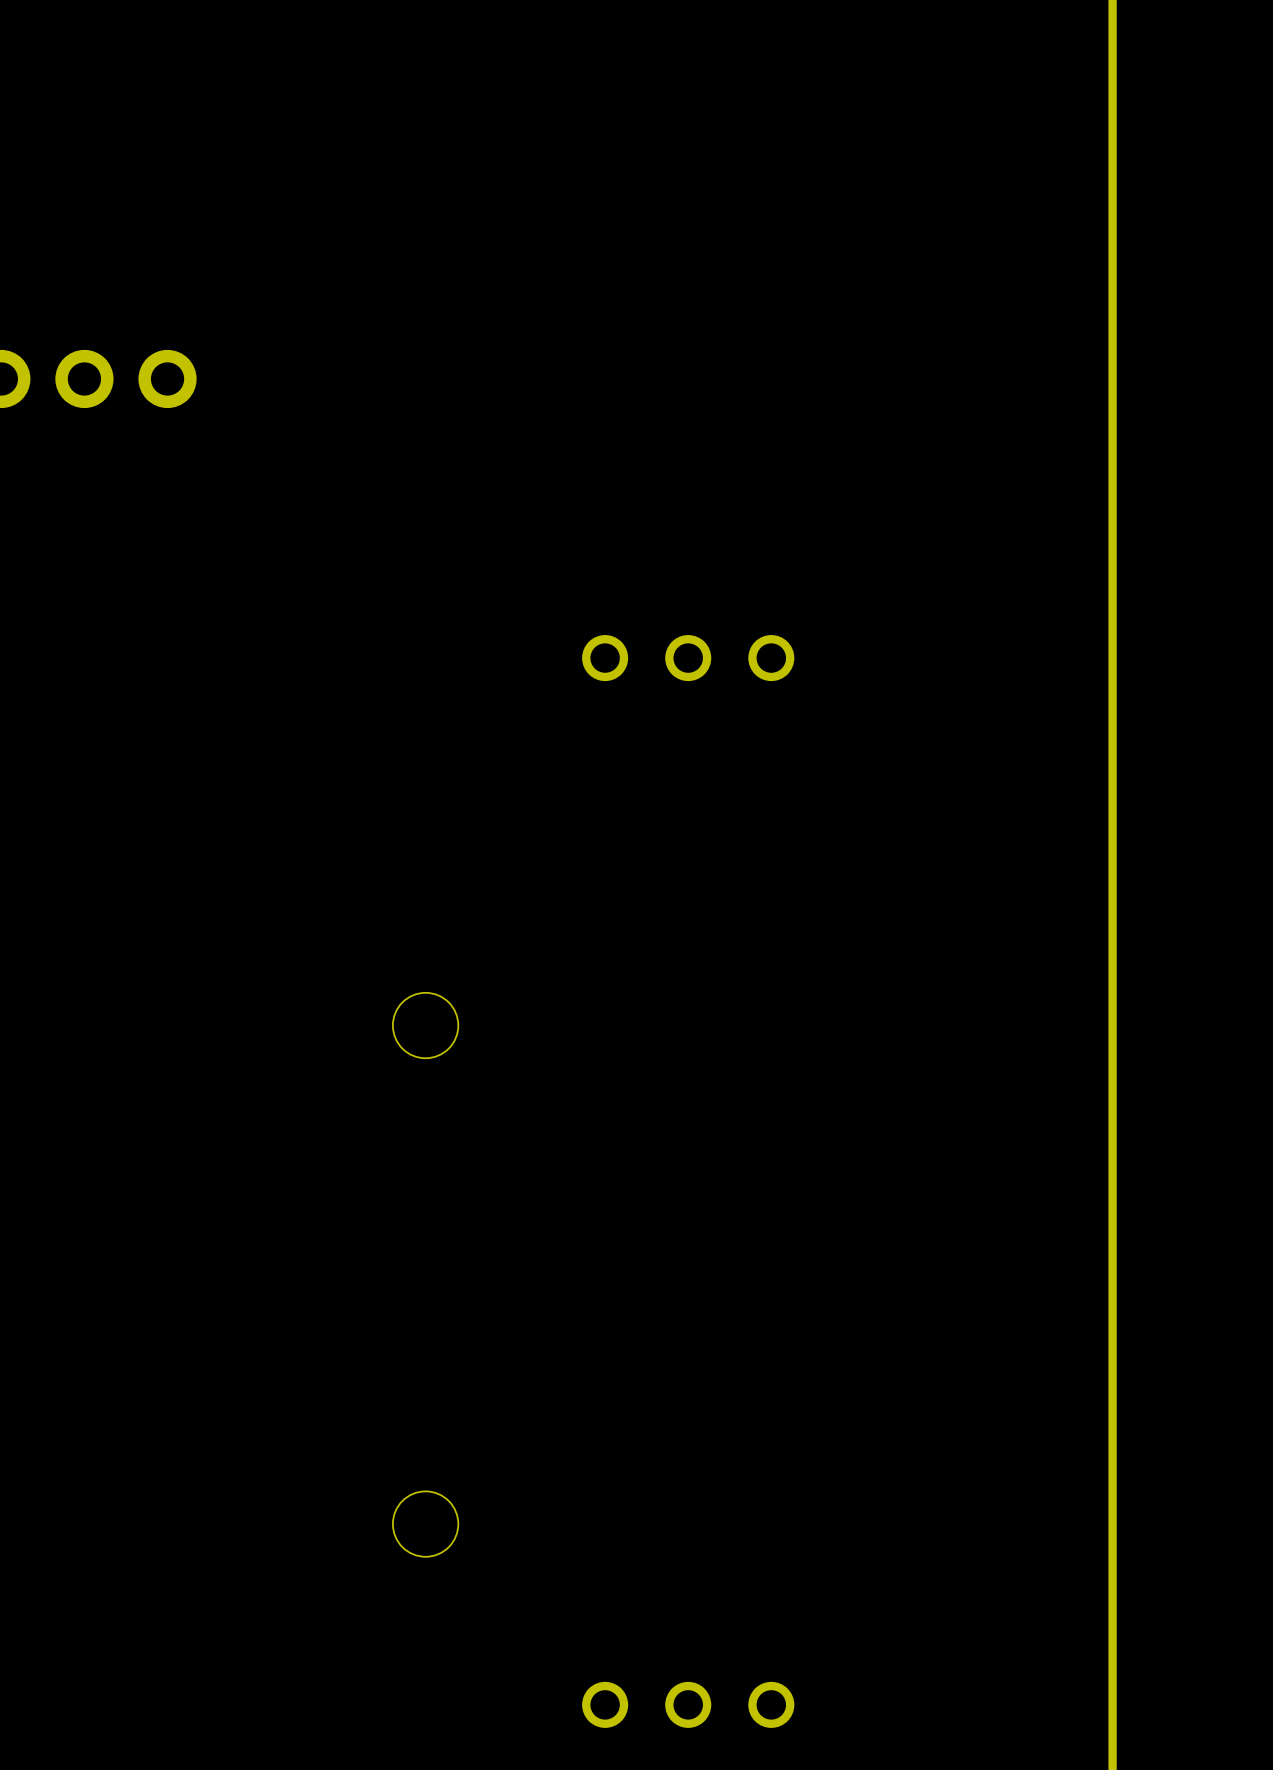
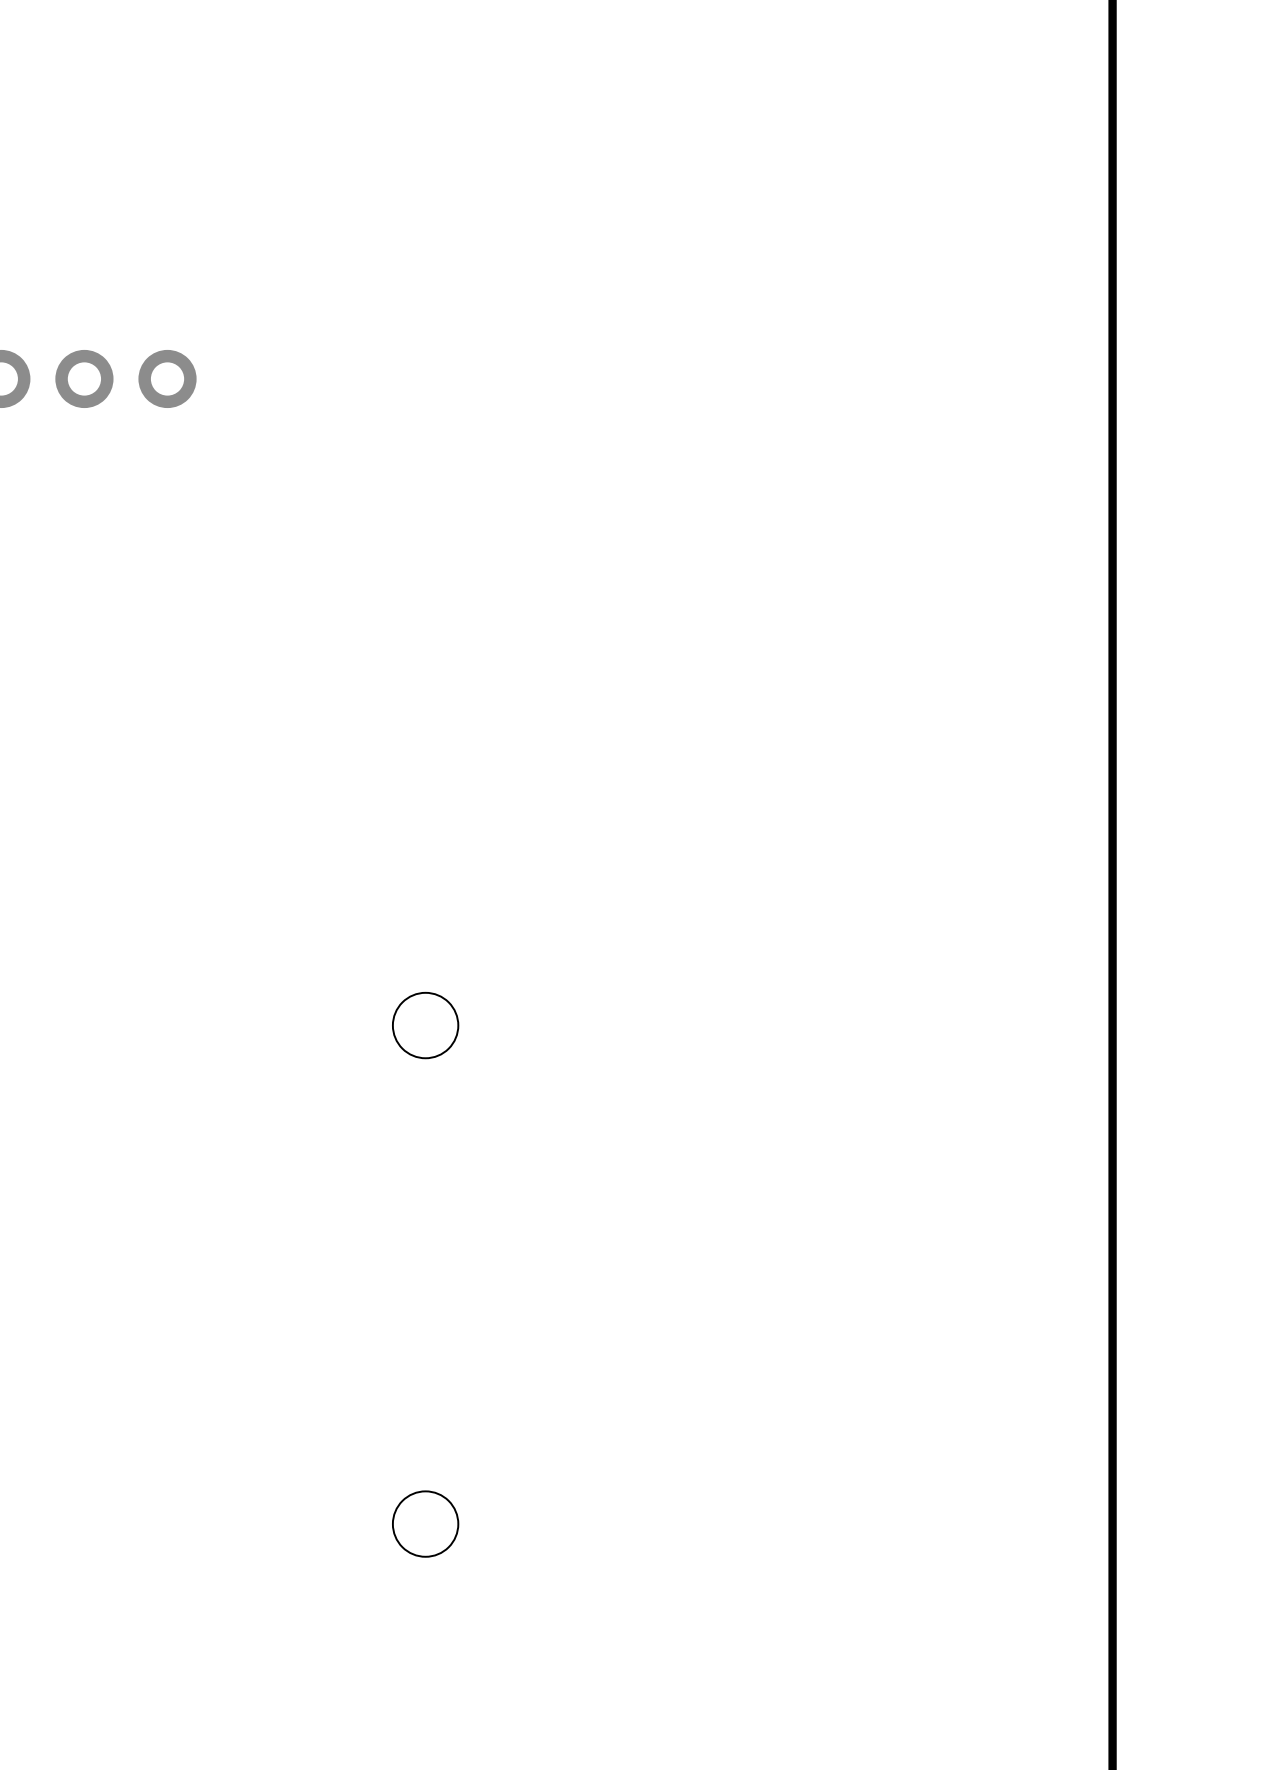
part: (688, 658) -> none
part: (688, 1704) -> none

